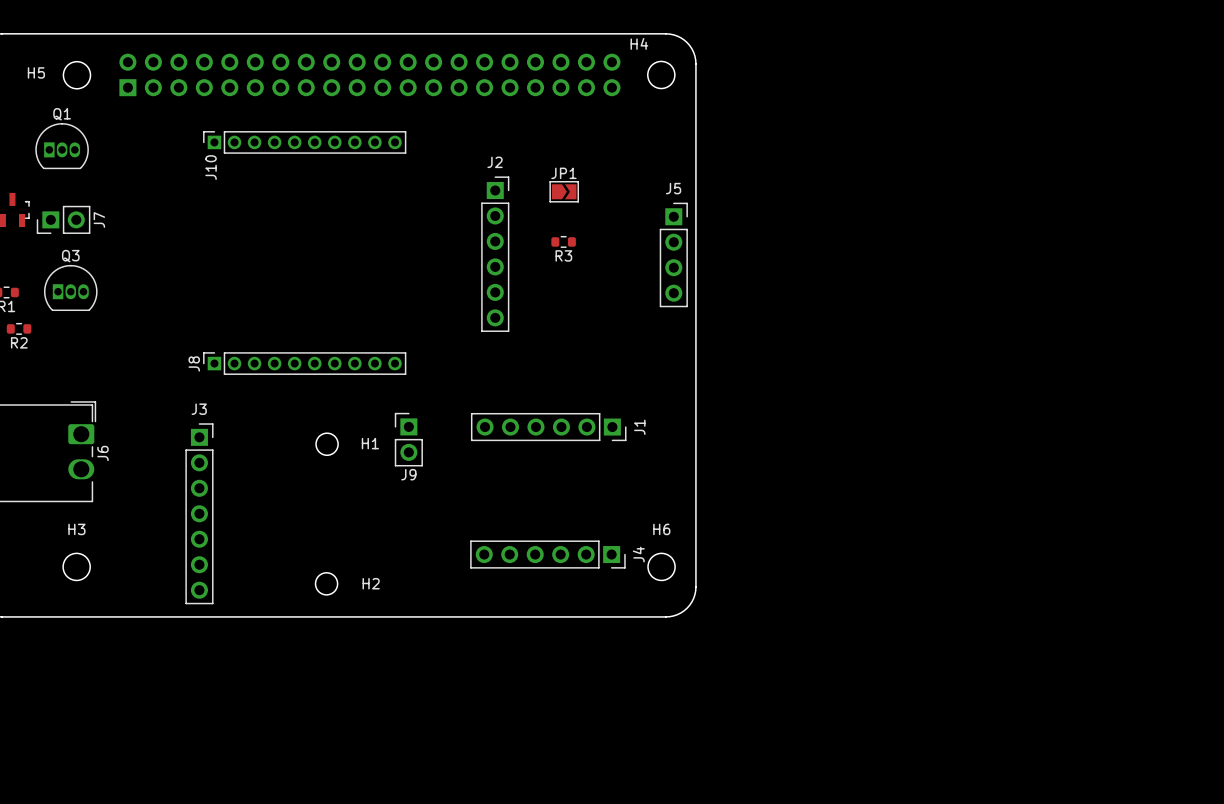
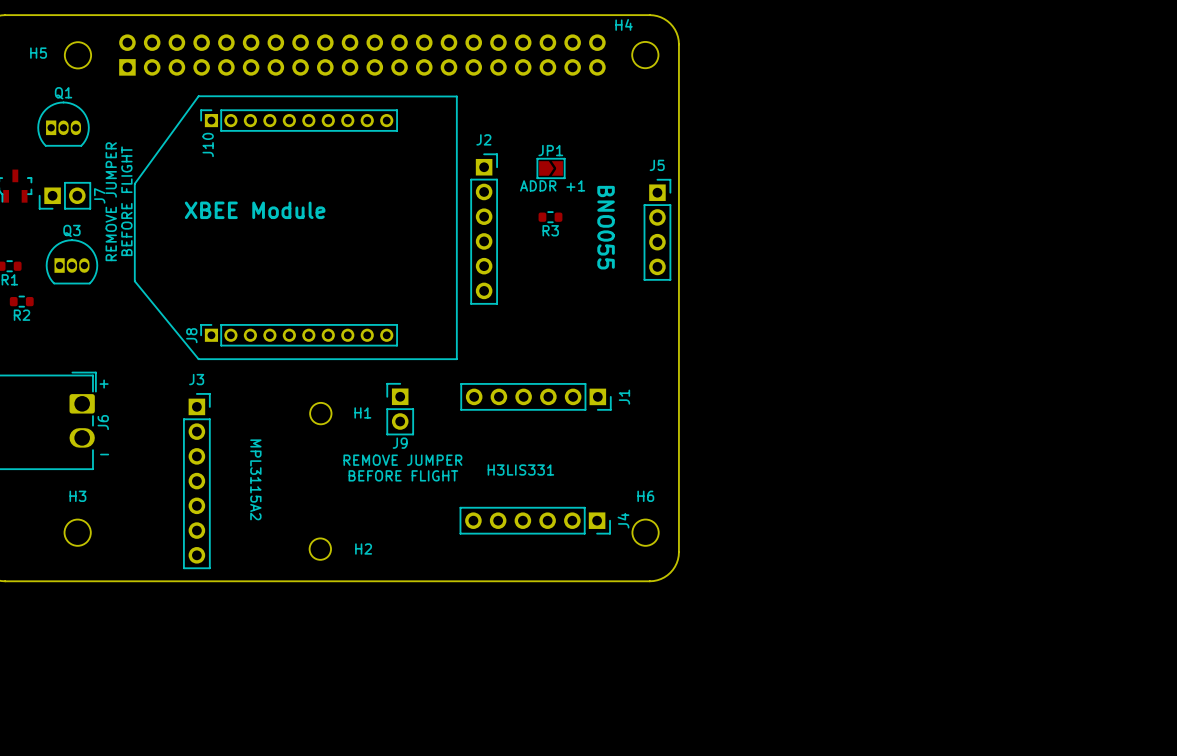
line: none -> (198, 96) (456, 96) (456, 359) (198, 359) (134, 281) (134, 183) (198, 96)
text: none -> ADDR +1 (552, 185)
text: none -> BEFORE FLIGHT (126, 201)
text: none -> REMOVE JUMPER (111, 201)
text: none -> XBEE Module (255, 210)
text: none -> BNO055 (606, 227)
text: none -> + (104, 384)
text: none -> - (104, 454)
text: none -> REMOVE JUMPER (402, 460)
text: none -> H3LIS331 (520, 470)
text: none -> BEFORE FLIGHT (403, 475)
text: none -> MPL3115A2 (255, 479)

